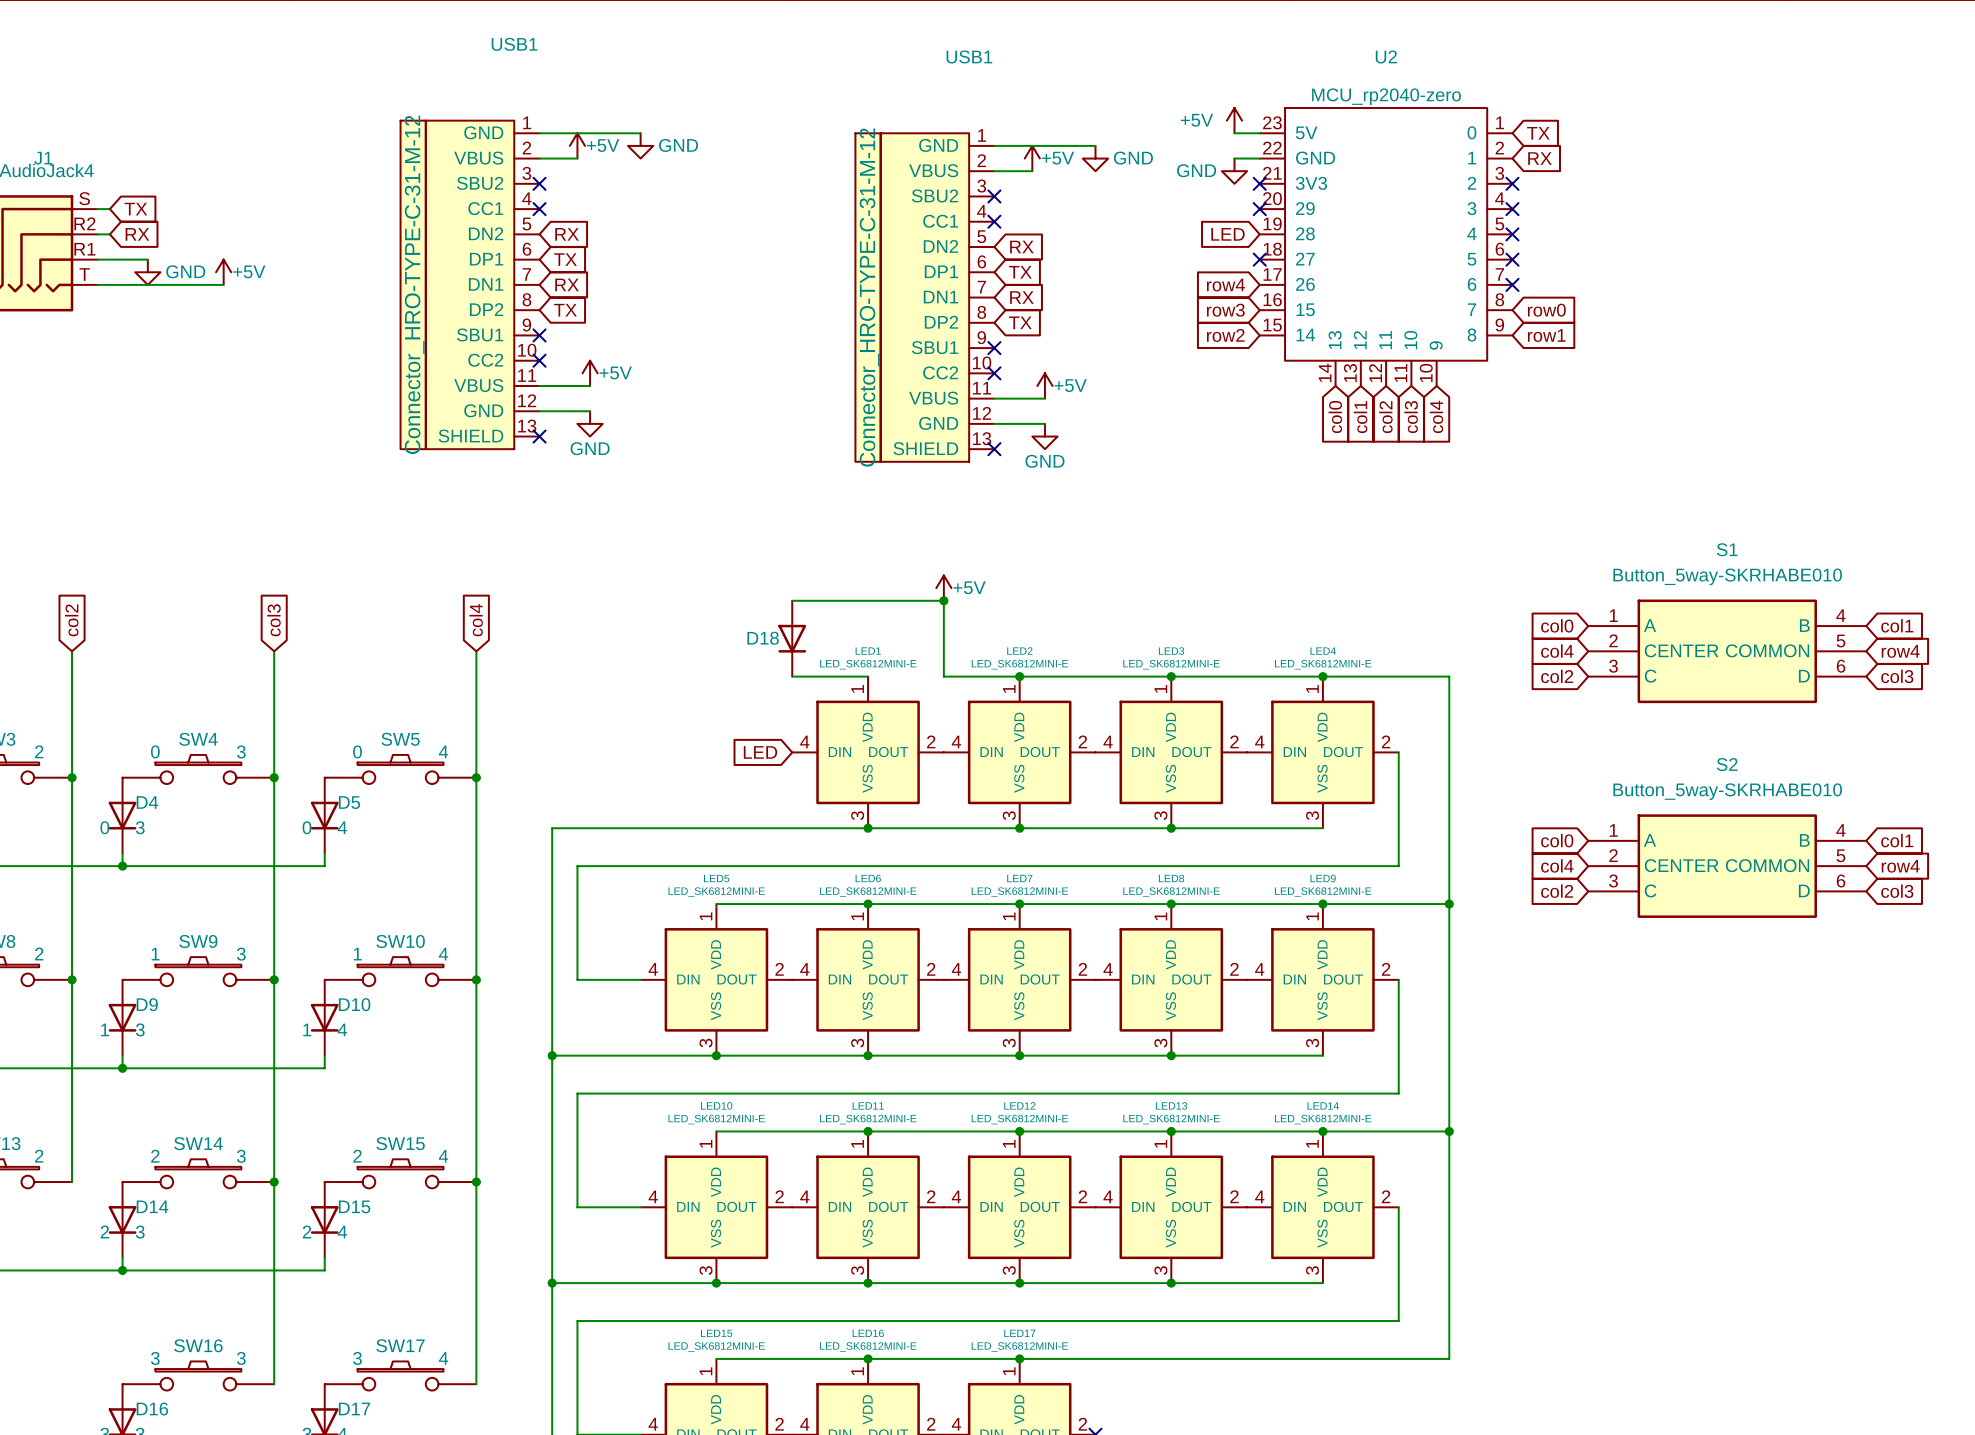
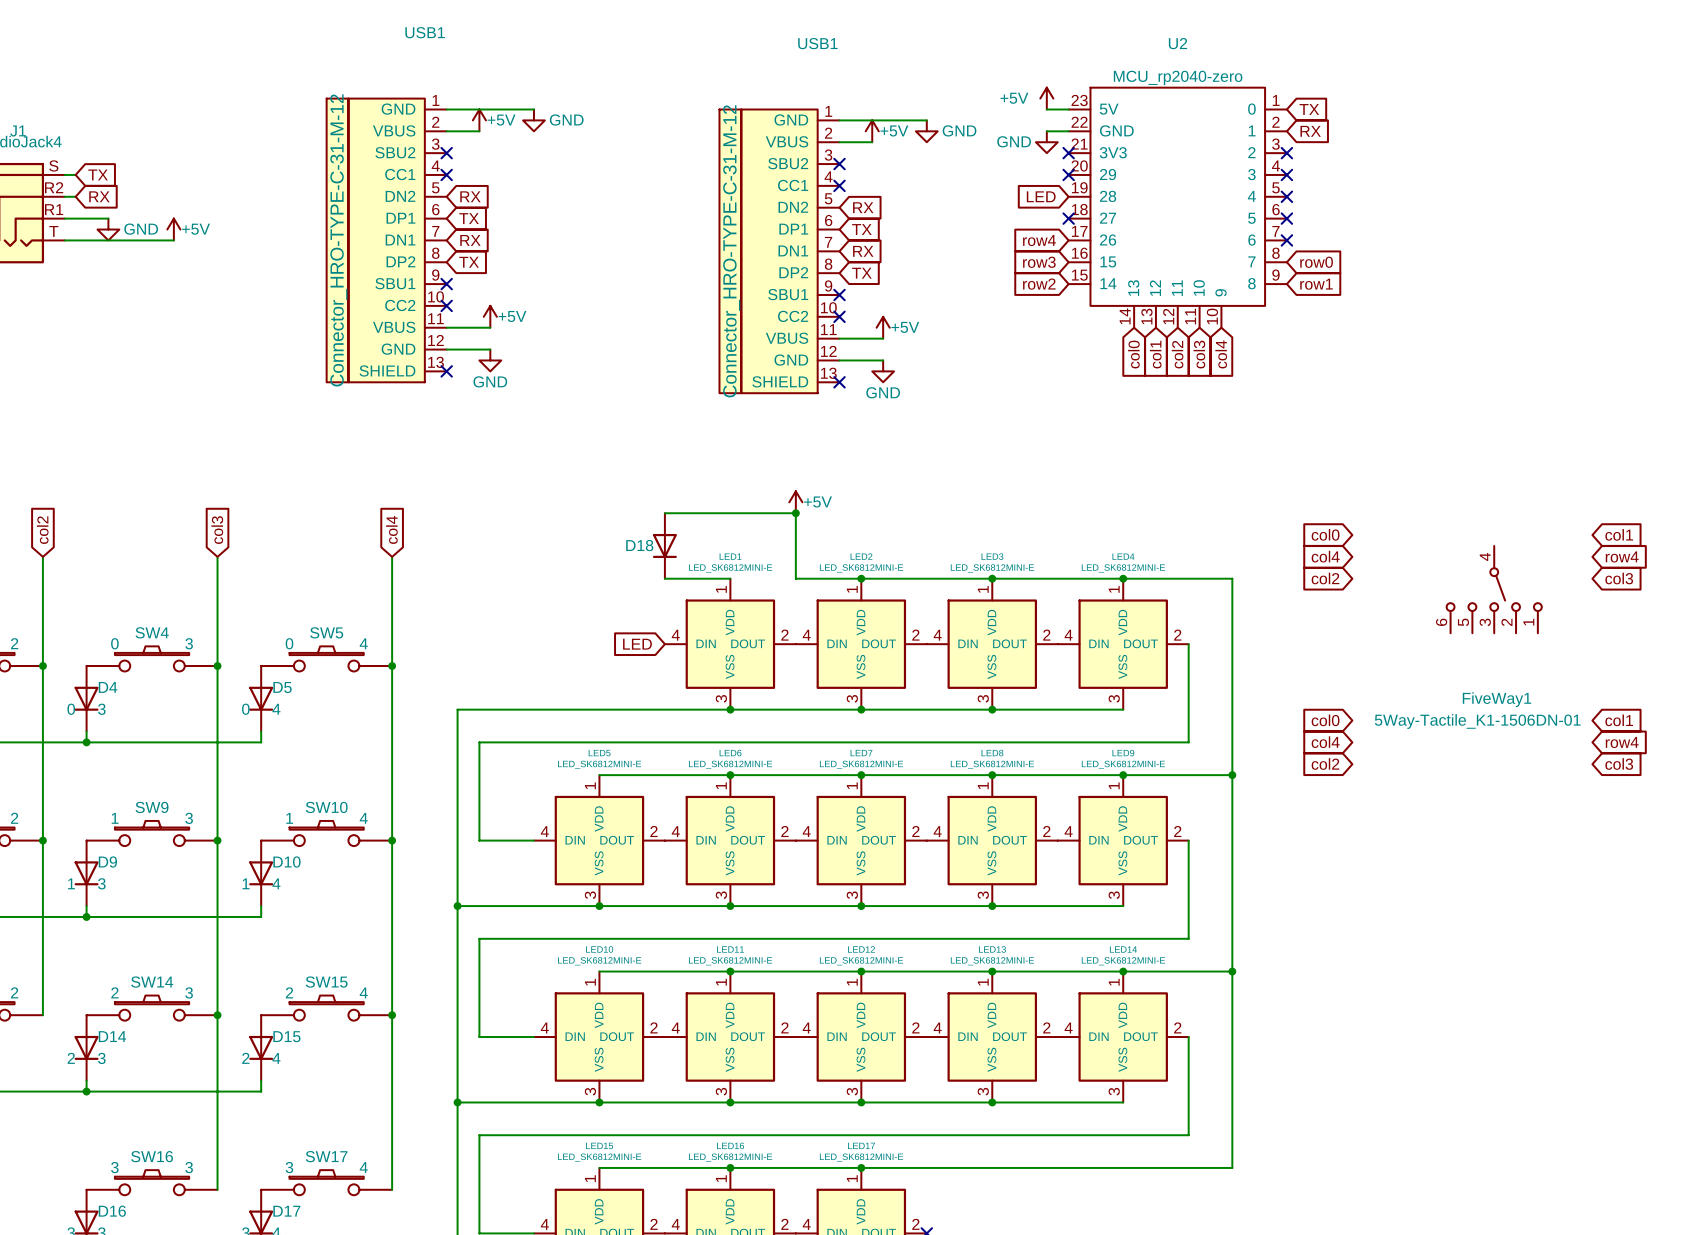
S1: Button_5way-SKRHABE010 (1727, 651) -> none
FiveWay1: none -> 5Way-Tactile_K1-1506DN-01 (1494, 589)
S2: Button_5way-SKRHABE010 (1727, 866) -> none

